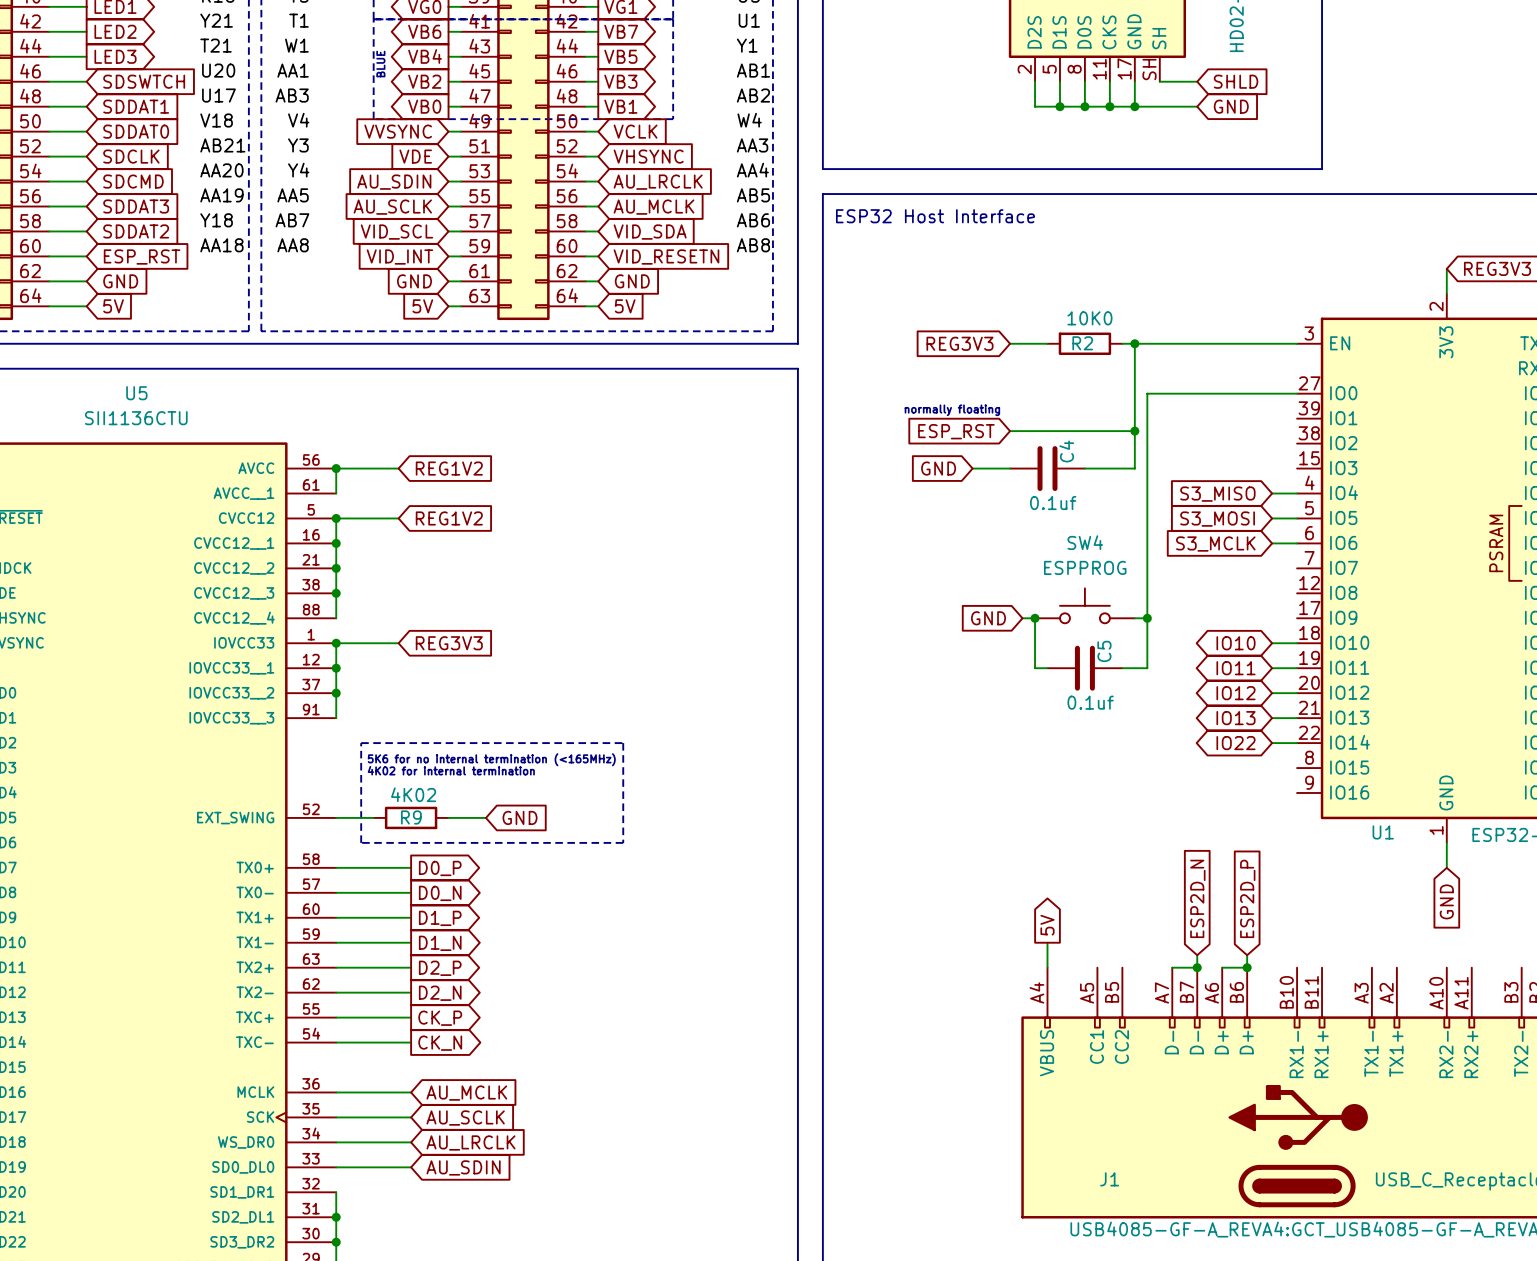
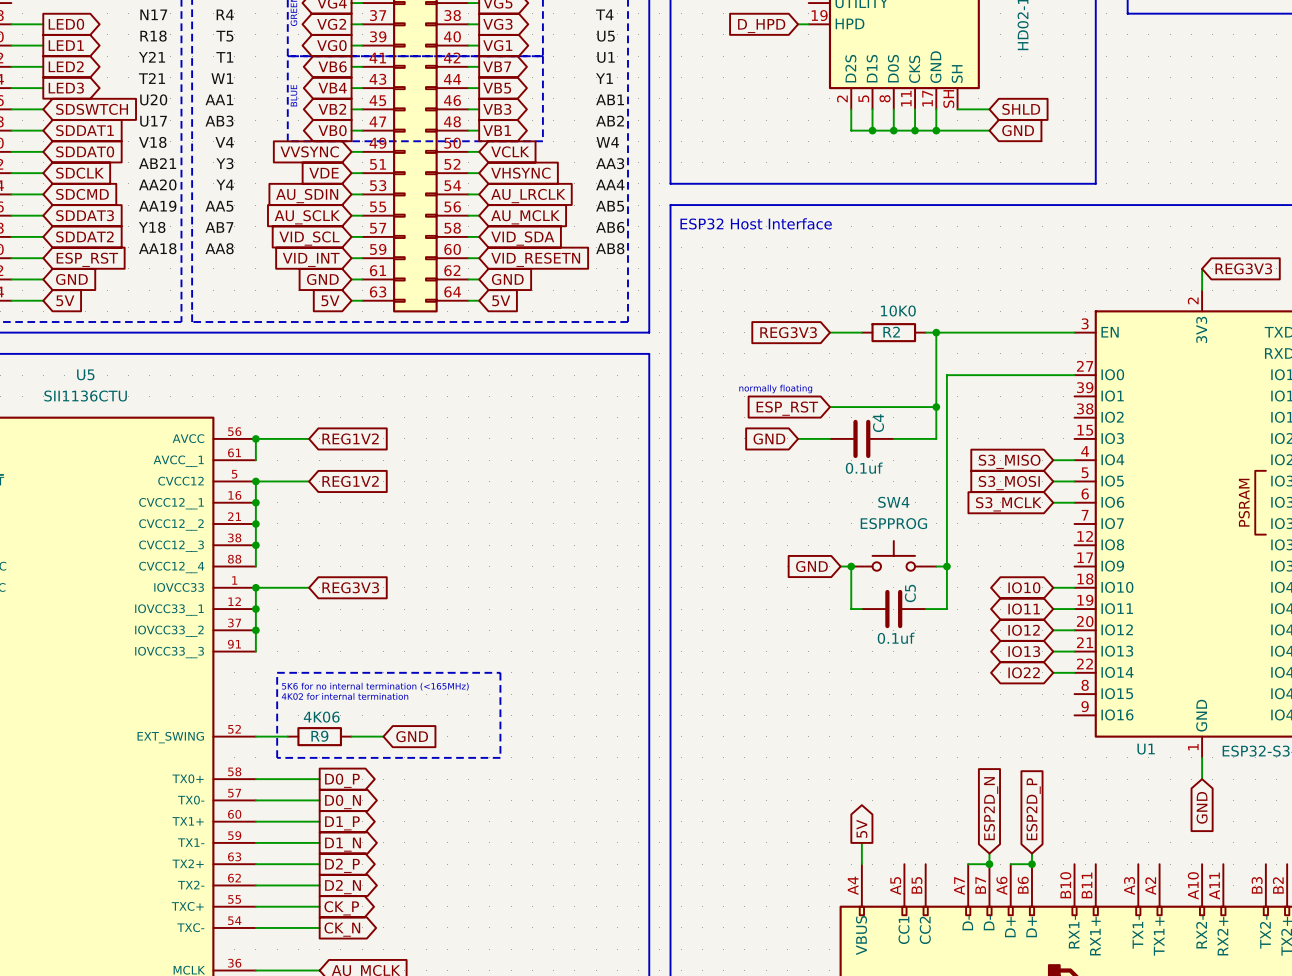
R9 value: 4K02 (413, 794) -> 4K06 (321, 717)

